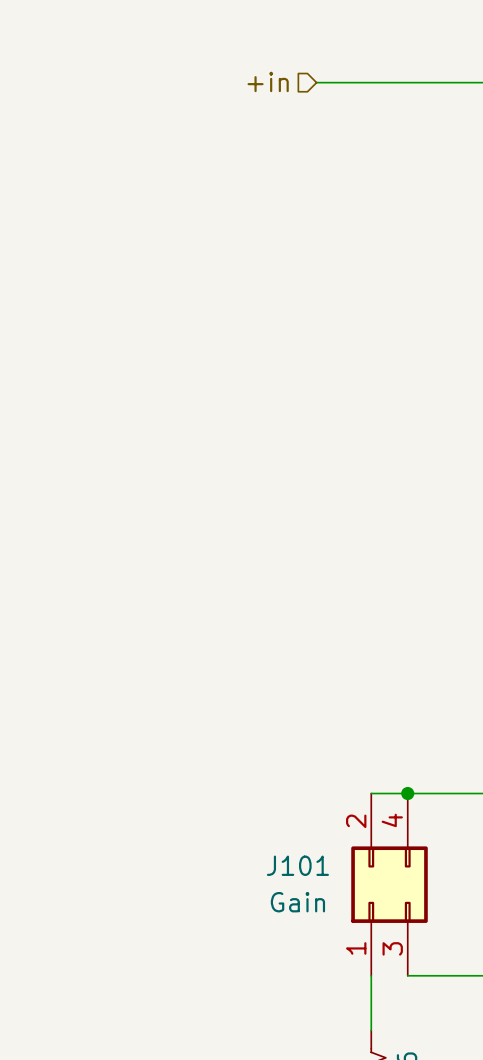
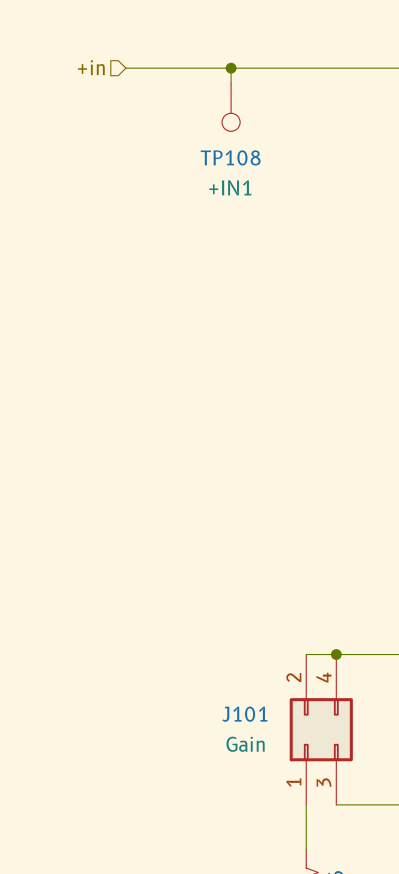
hierarchical label position: +in (268, 81) -> +in (91, 67)
wire: none -> (125, 68) (261, 68)
wire: none -> (231, 68) (231, 83)
junction: none -> (231, 68)
TP108: none -> +IN1 (231, 107)

